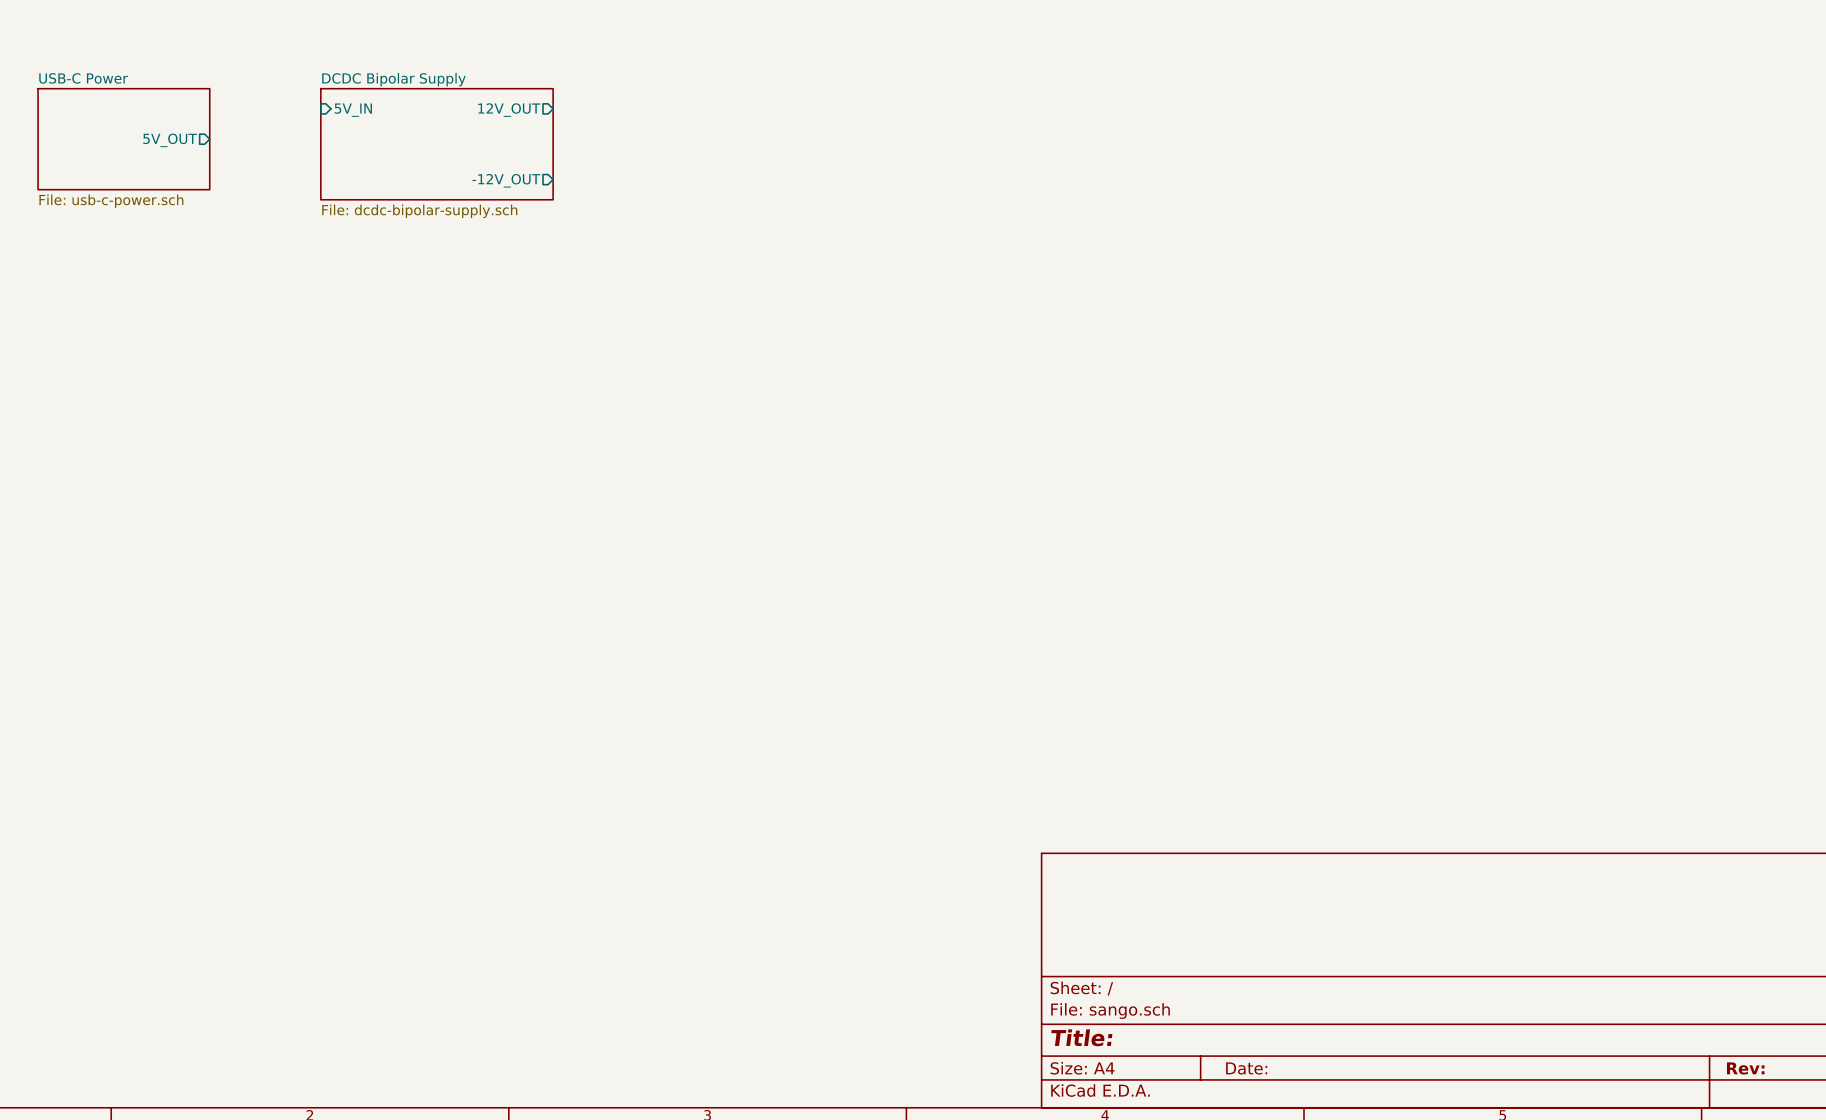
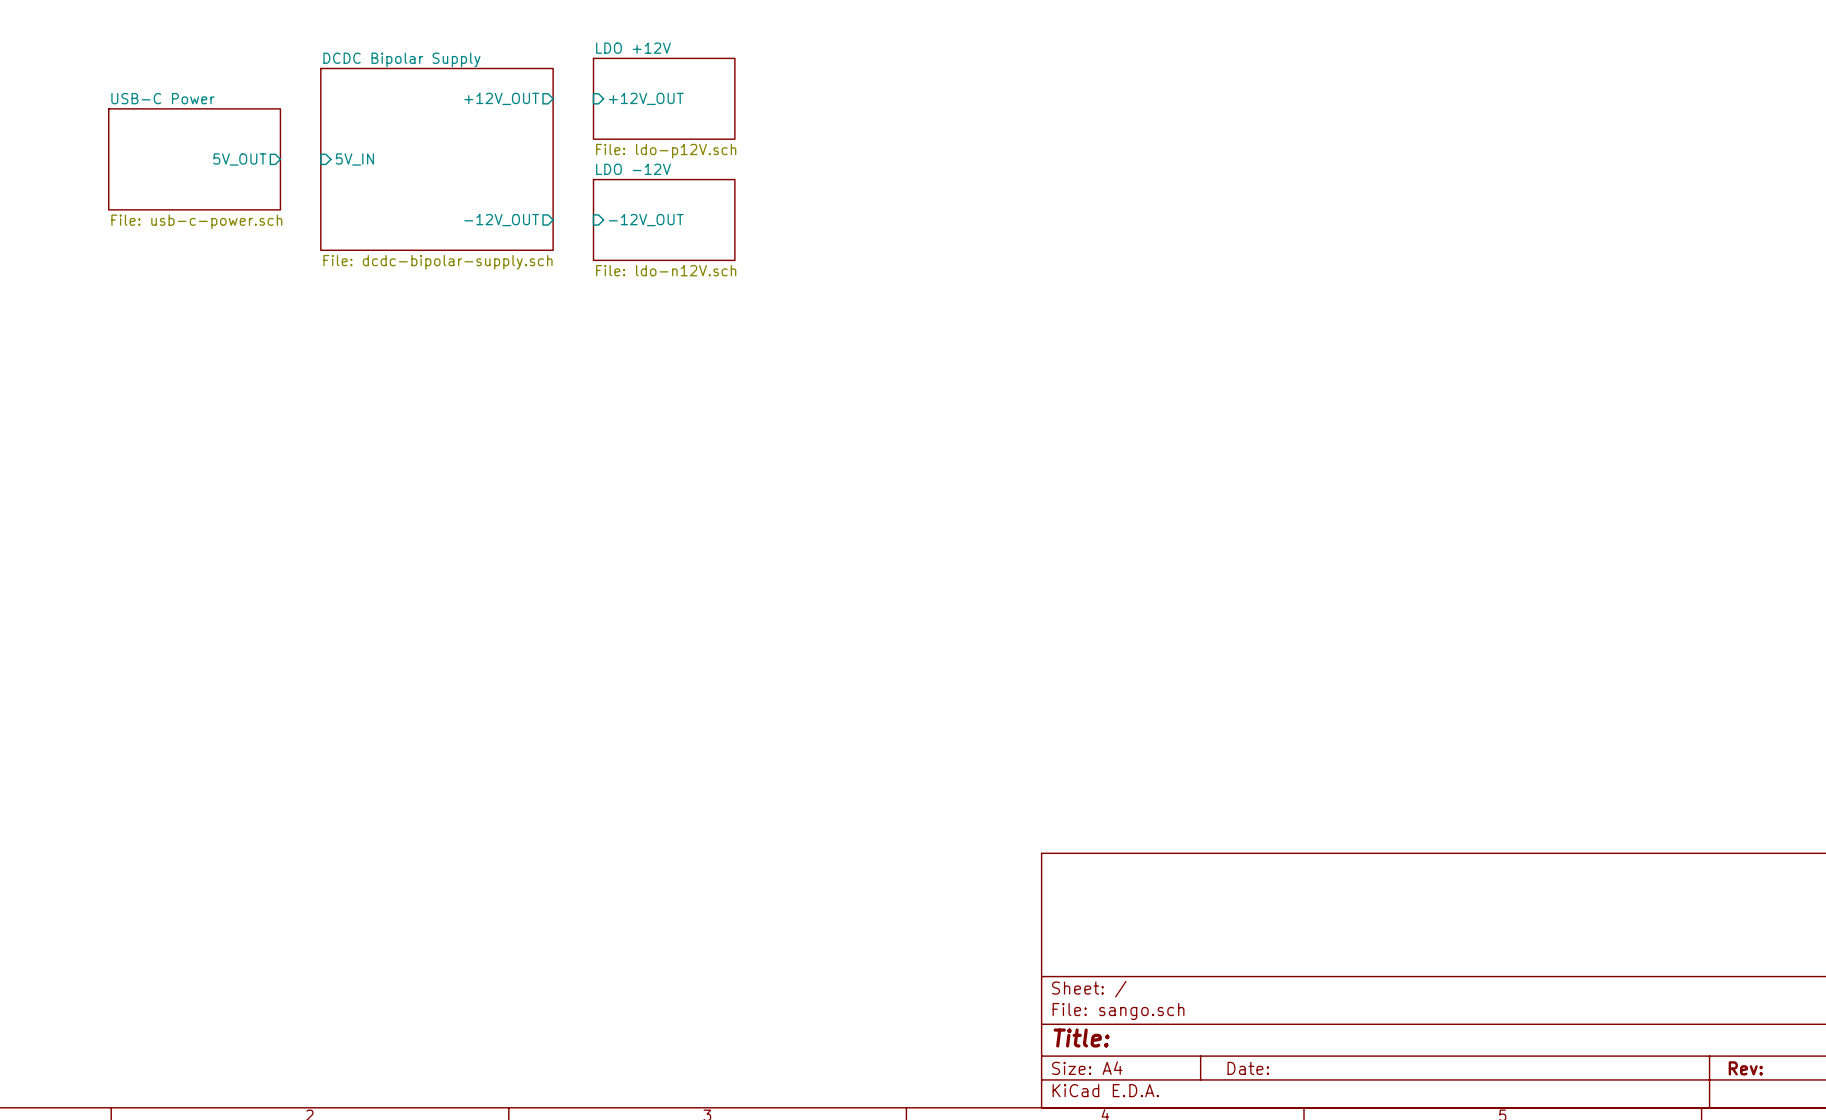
sheet LDO +12V: none -> File: ldo-p12V.sch (664, 98)
sheet pin: none -> +12V_OUT (646, 98)
sheet pin position: 5V_IN (353, 110) -> 5V_IN (354, 159)
sheet pin: 12V_OUT (509, 110) -> +12V_OUT (501, 98)
sheet USB-C Power position: (123, 139) -> (194, 159)
sheet pin position: 5V_OUT (170, 140) -> 5V_OUT (239, 159)
sheet DCDC Bipolar Supply: File: dcdc-bipolar-supply.sch (436, 144) -> none
sheet DCDC Bipolar Supply: none -> File: dcdc-bipolar-supply.sch (436, 159)
sheet pin: -12V_OUT (506, 180) -> none
sheet LDO -12V: none -> File: ldo-n12V.sch (664, 219)
sheet pin: none -> -12V_OUT (501, 220)
sheet pin: none -> -12V_OUT (646, 220)

